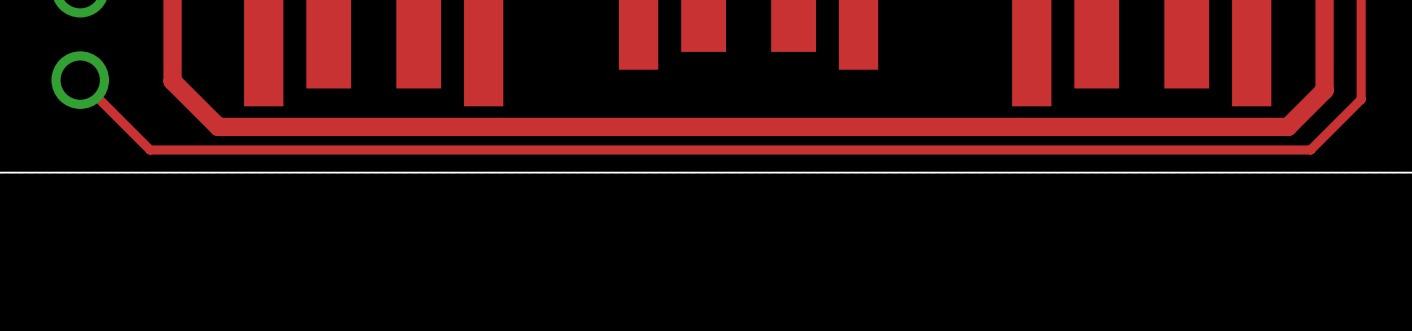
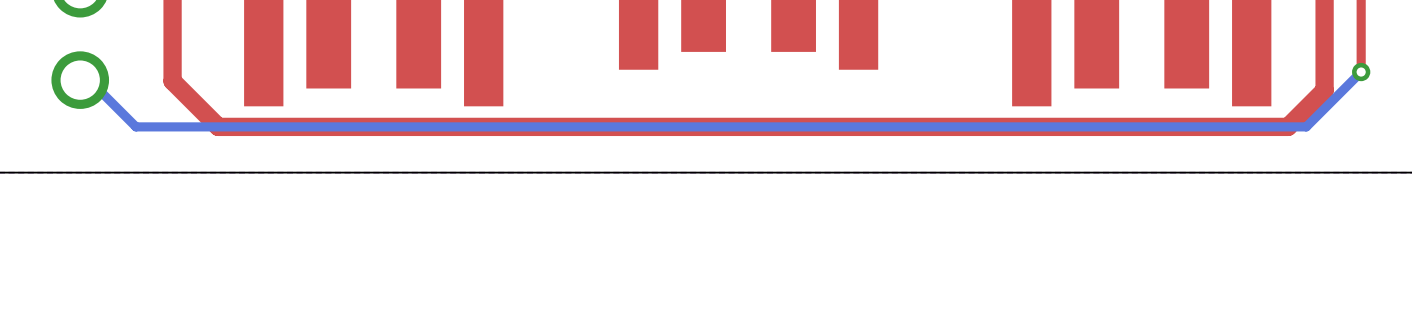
top track: (1361, 72) (1361, 99) (1310, 150) (150, 150) (80, 80) -> none
bottom track: none -> (1361, 72) (1306, 126) (135, 126) (89, 80)
via: none -> (1361, 72)

